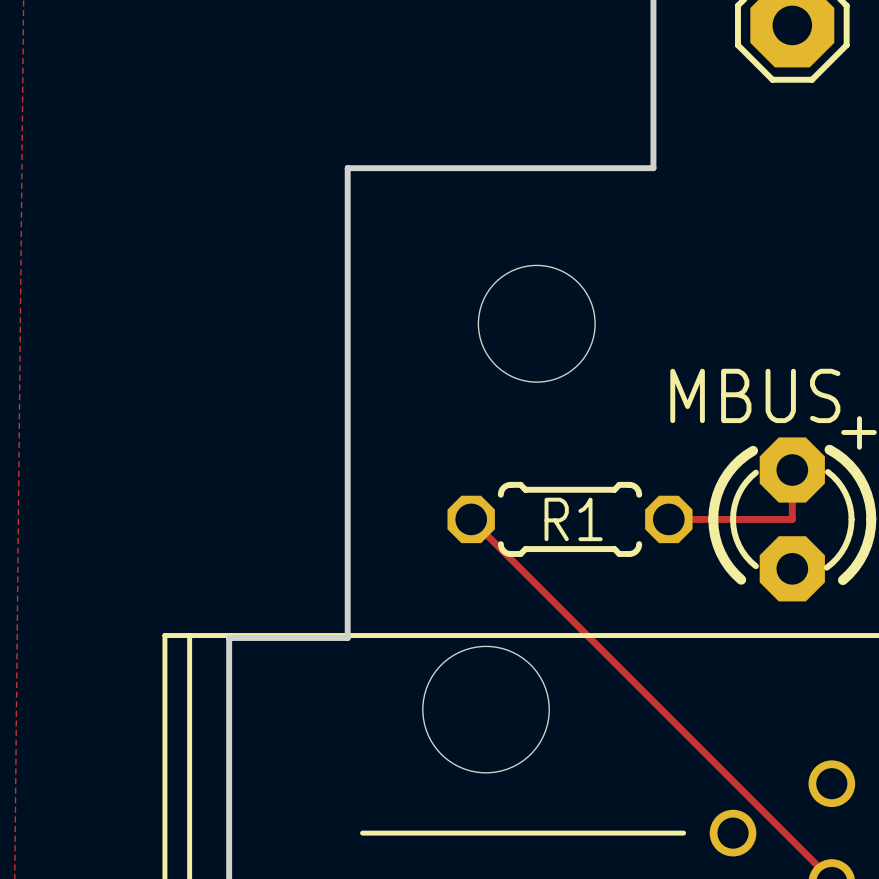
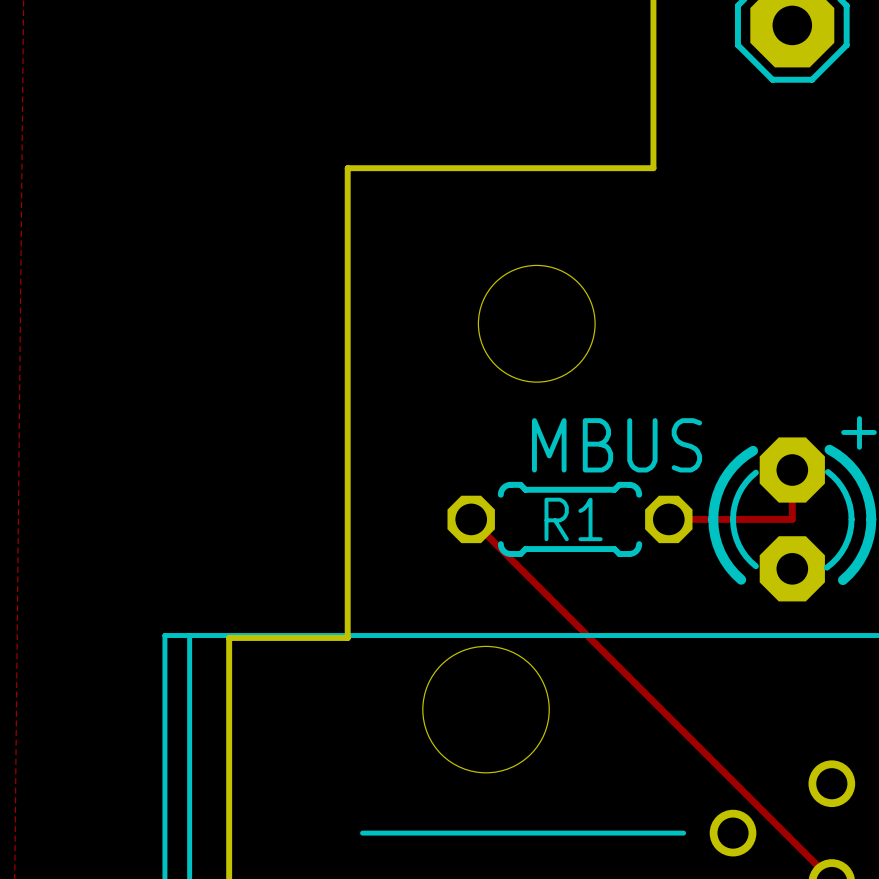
MBUS name position: MBUS (755, 395) -> MBUS (617, 445)

